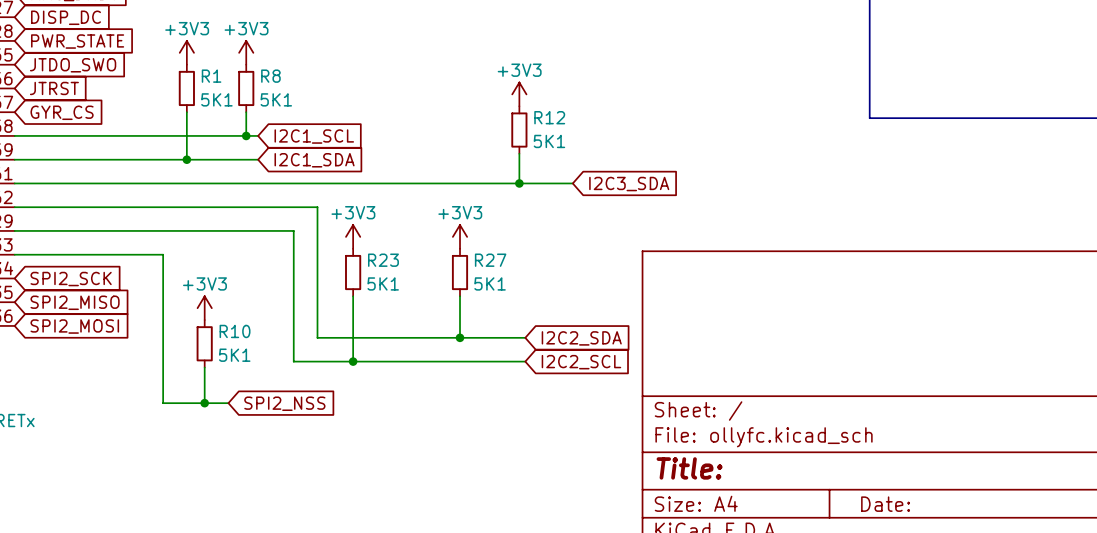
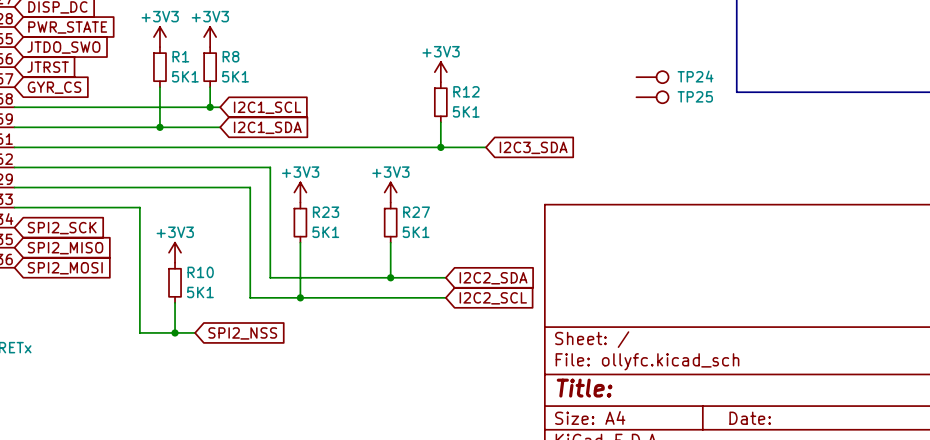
TP24: none -> (652, 77)
TP25: none -> (652, 97)

